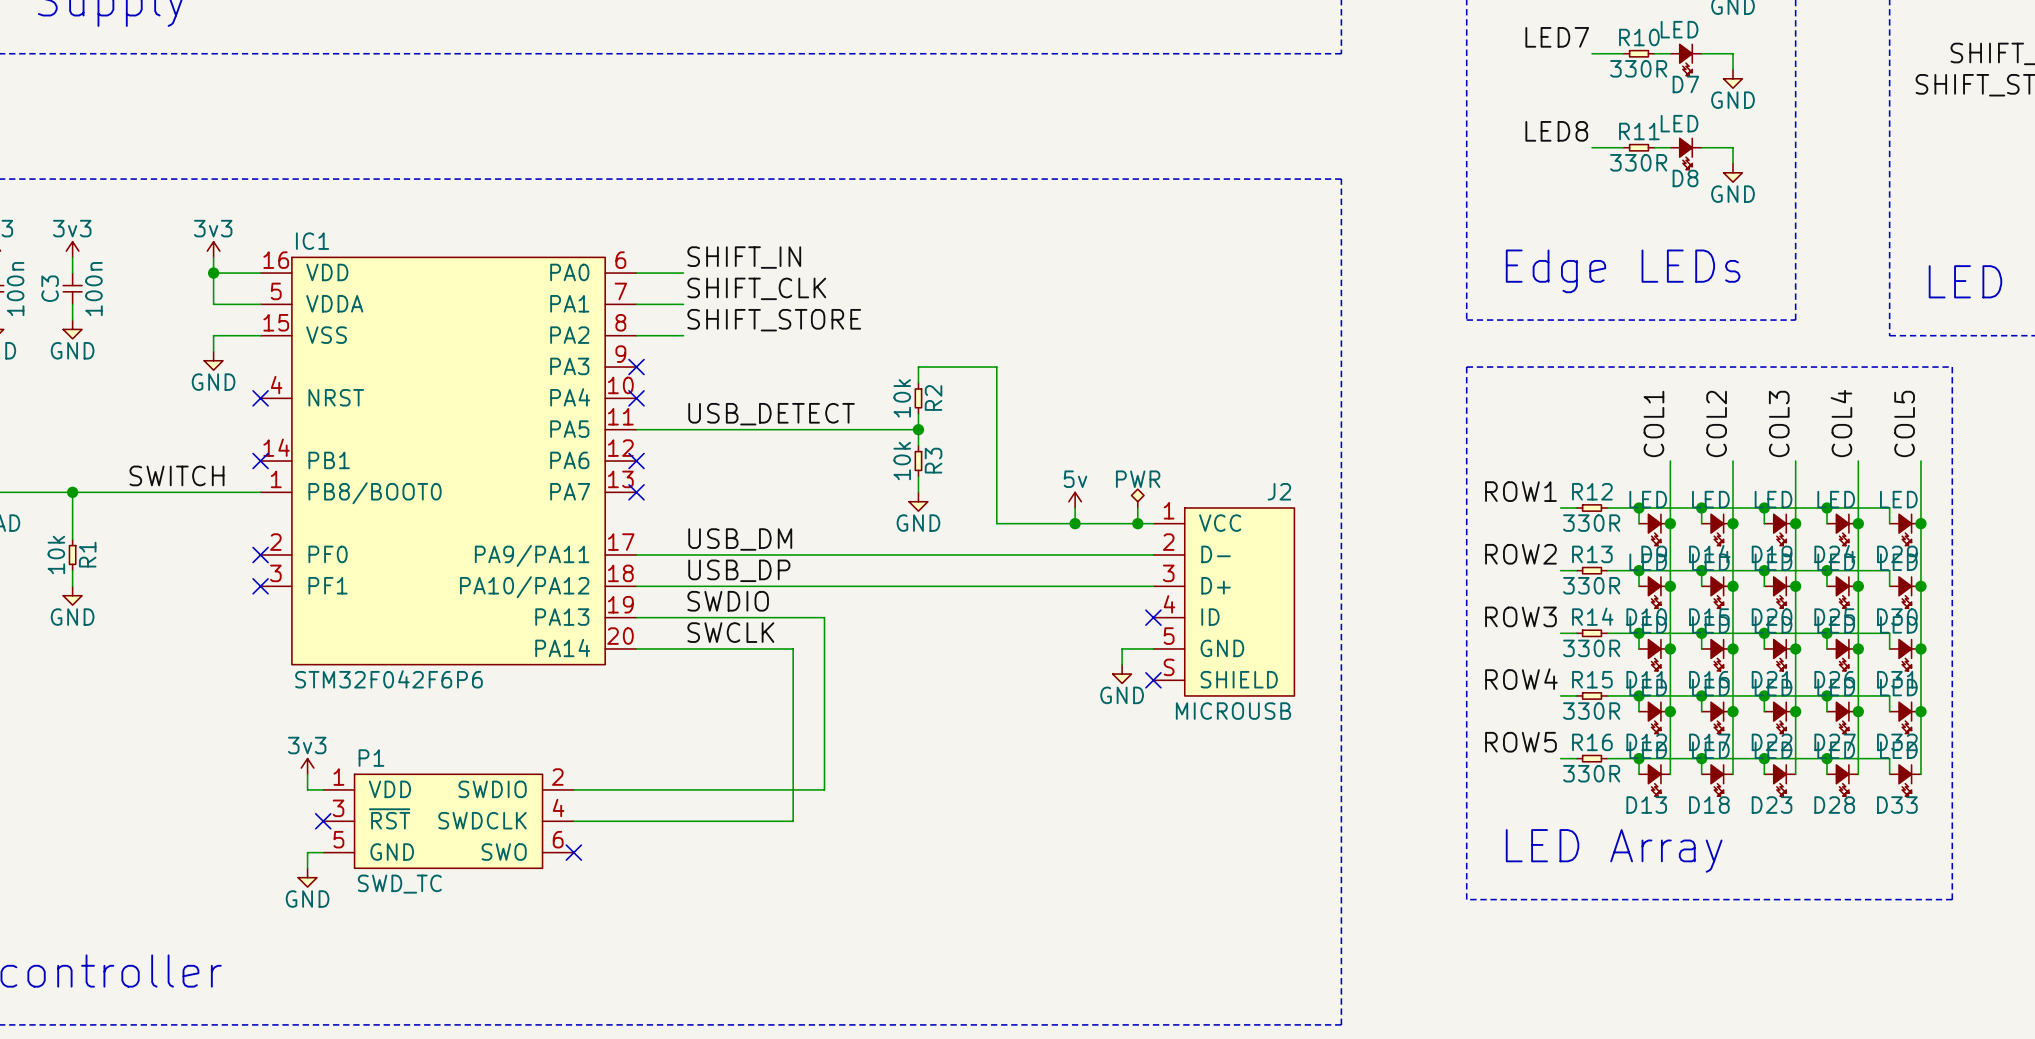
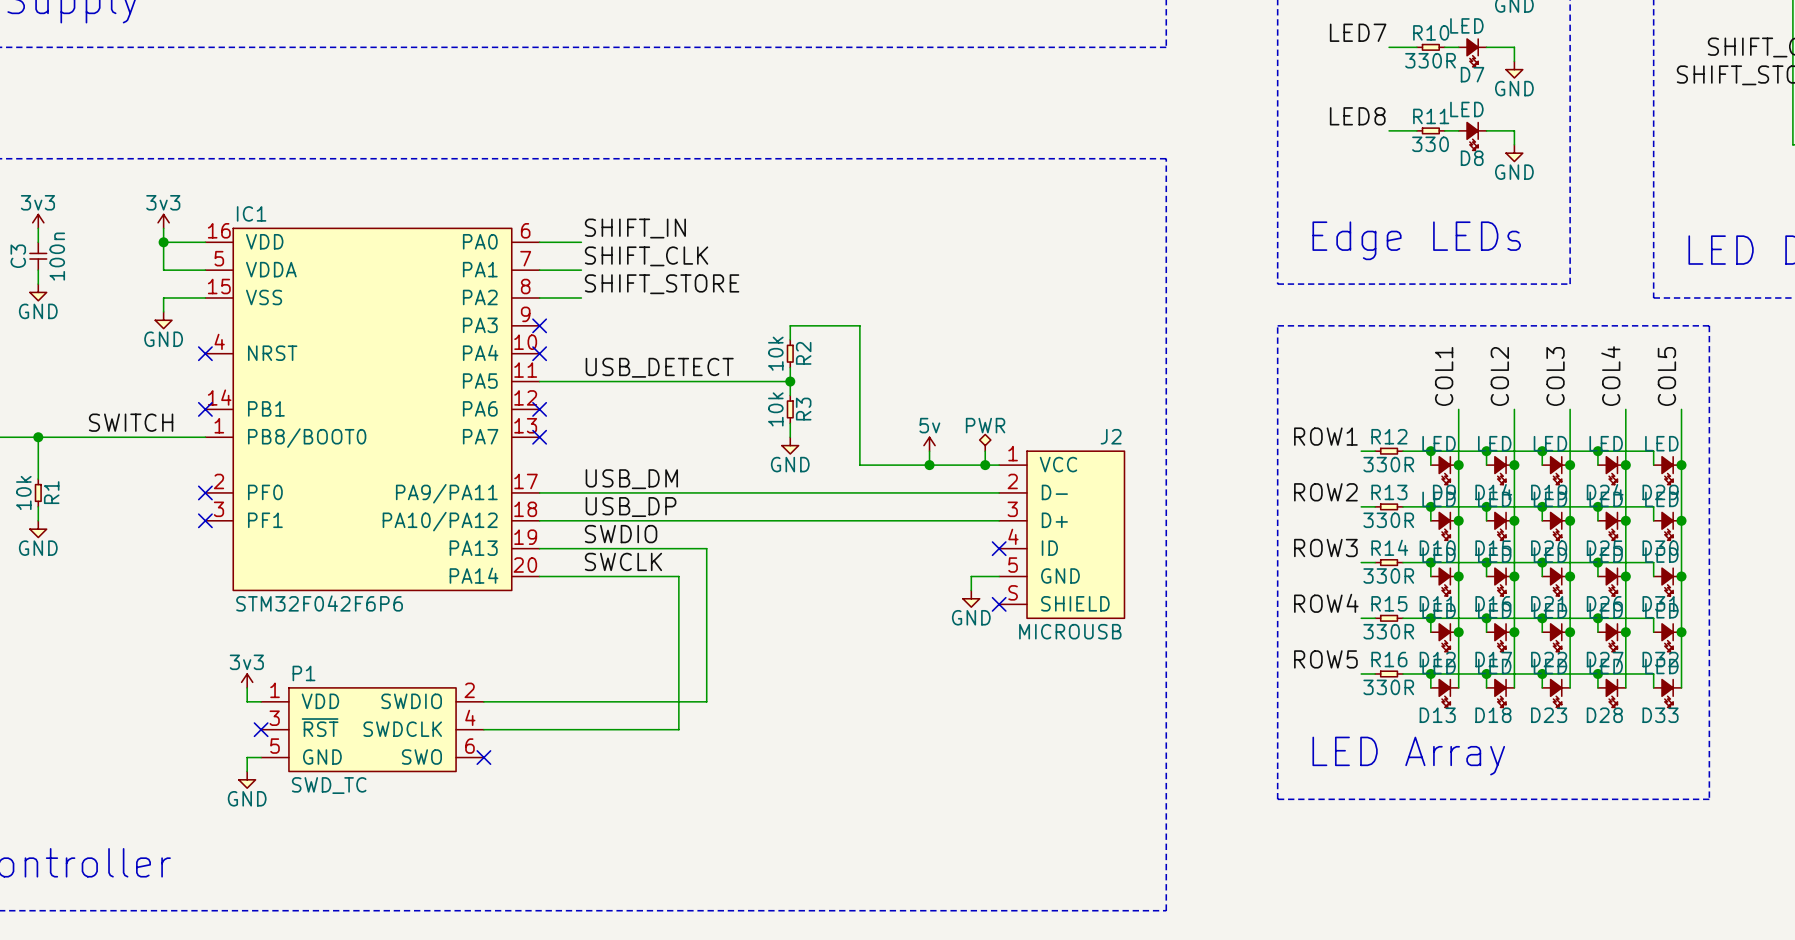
R11 value: 330R (1638, 162) -> 330 (1430, 144)

